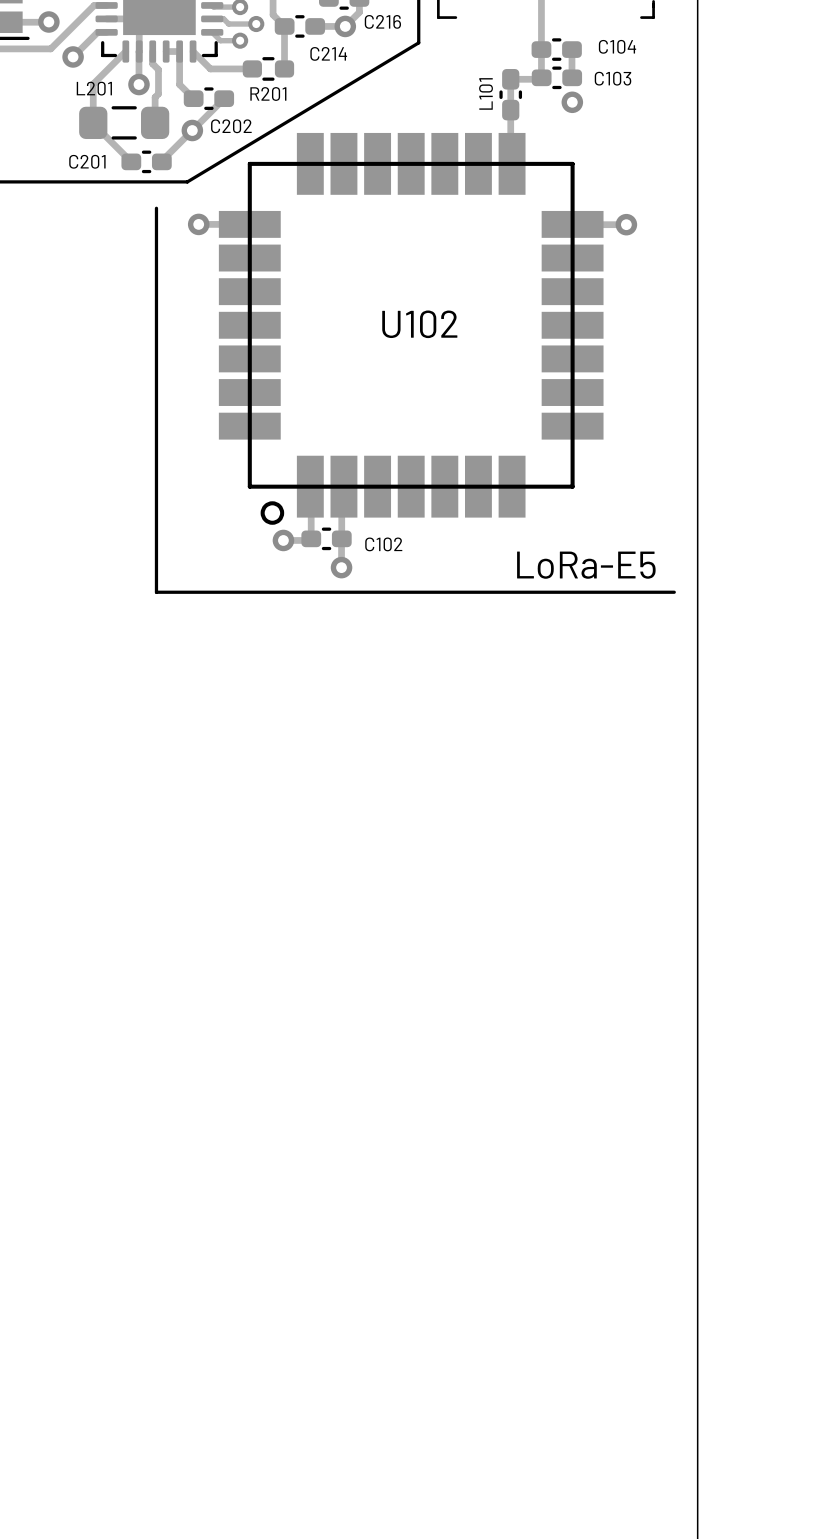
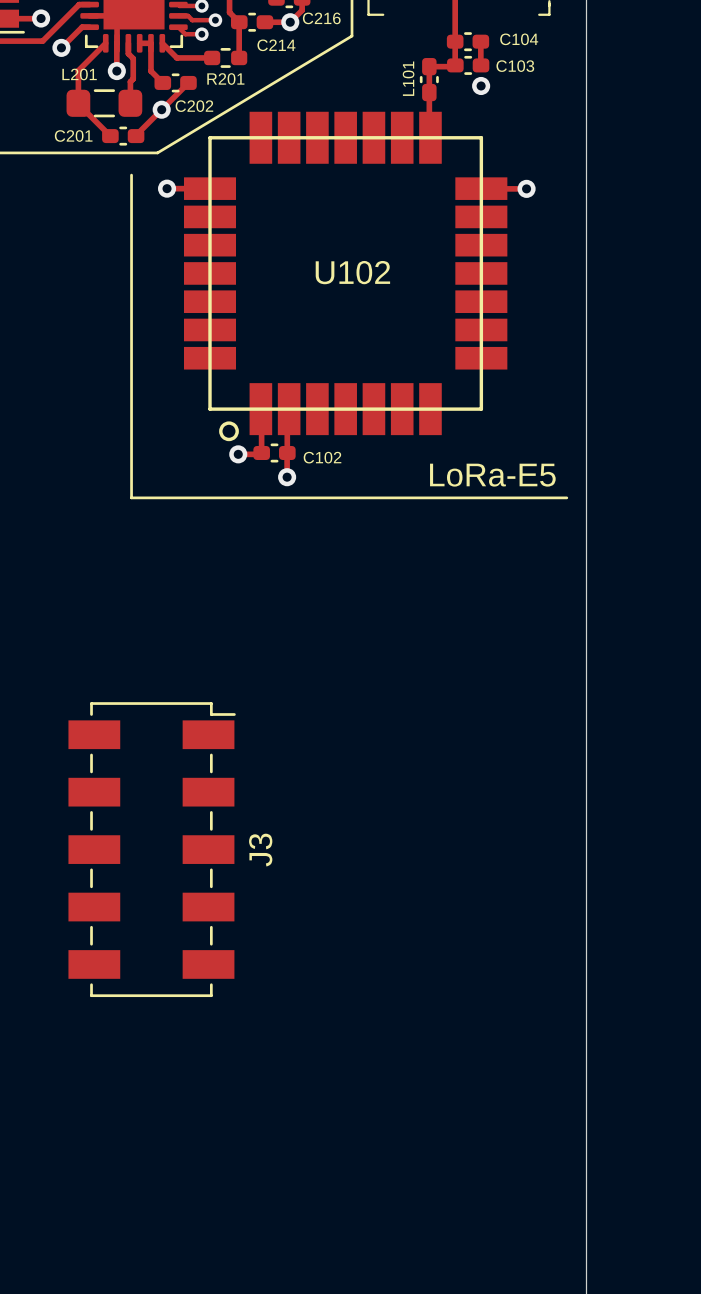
J3: none -> (152, 849)

